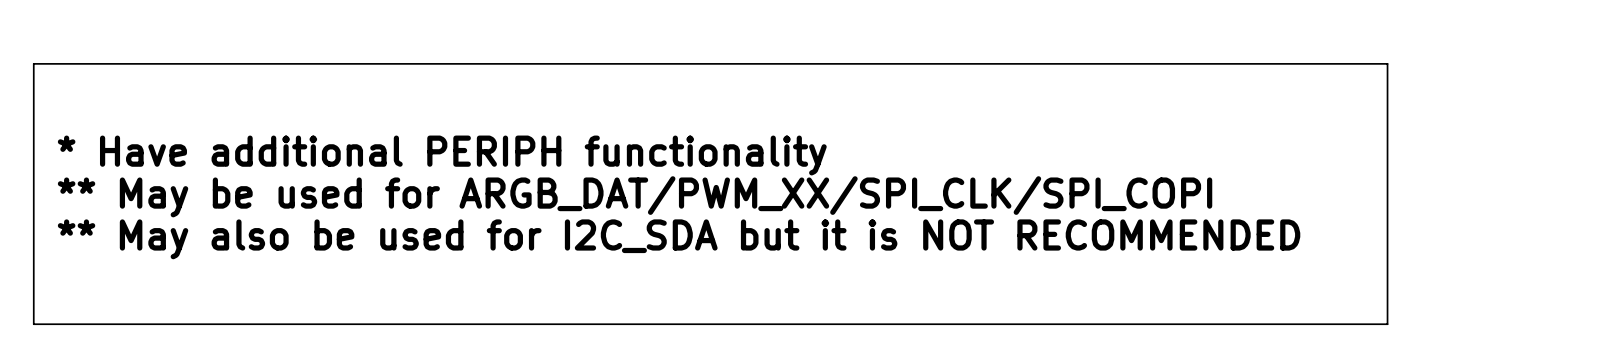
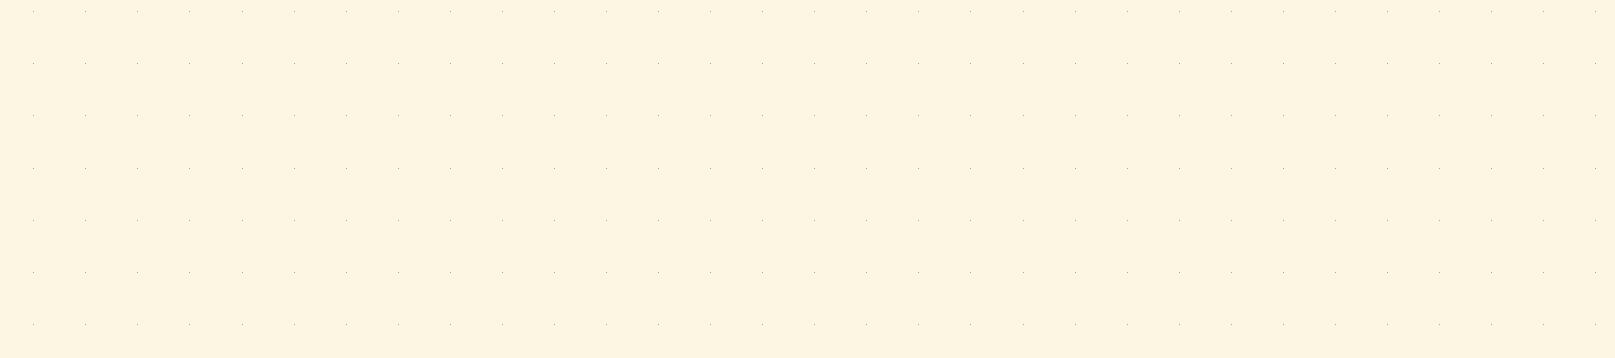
line: (33, 63) (1387, 63) (1387, 324) (33, 324) (33, 63) -> none
text: * Have additional PERIPH functionality (442, 155) -> none
text: ** May be used for ARGB_DAT/PWM_XX/SPI_CLK/SPI_COPI (635, 196) -> none
text: ** May also be used for I2C_SDA but it is NOT RECOMMENDED (679, 239) -> none

